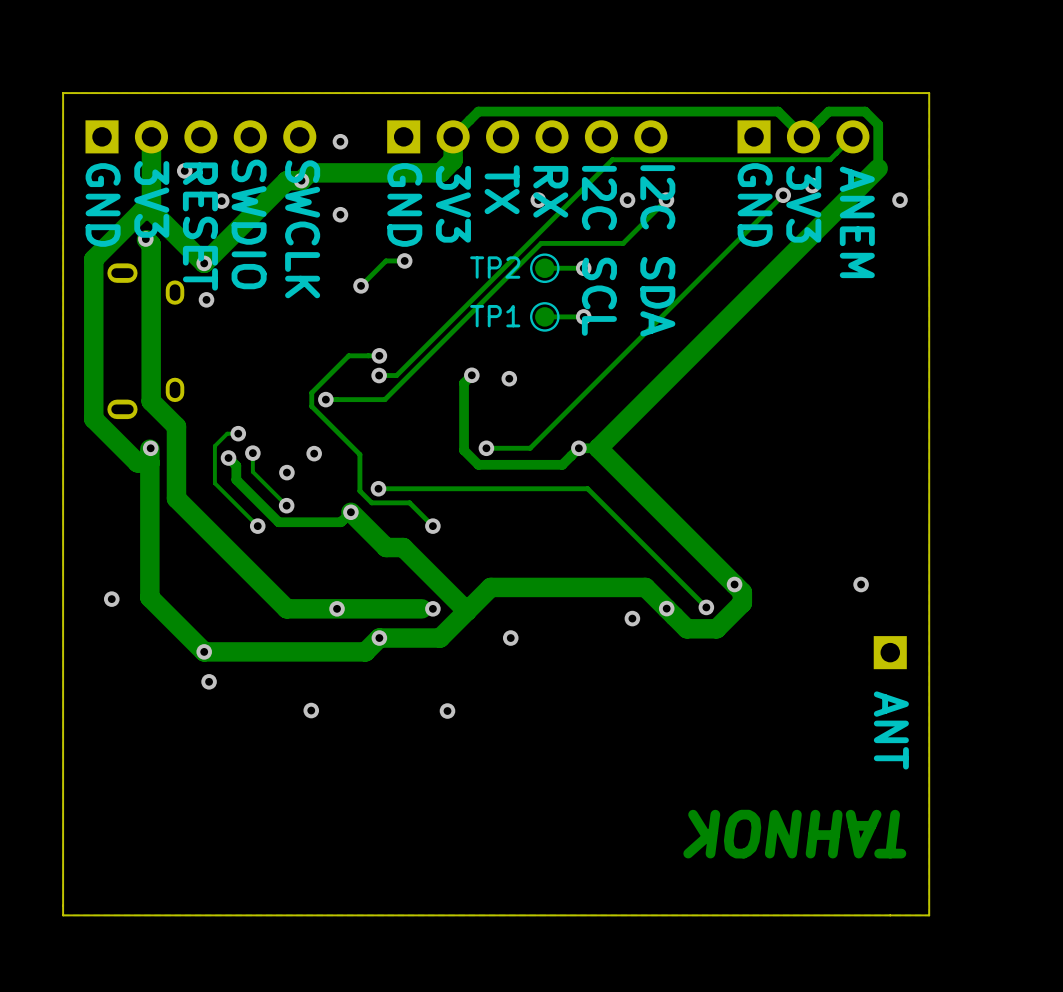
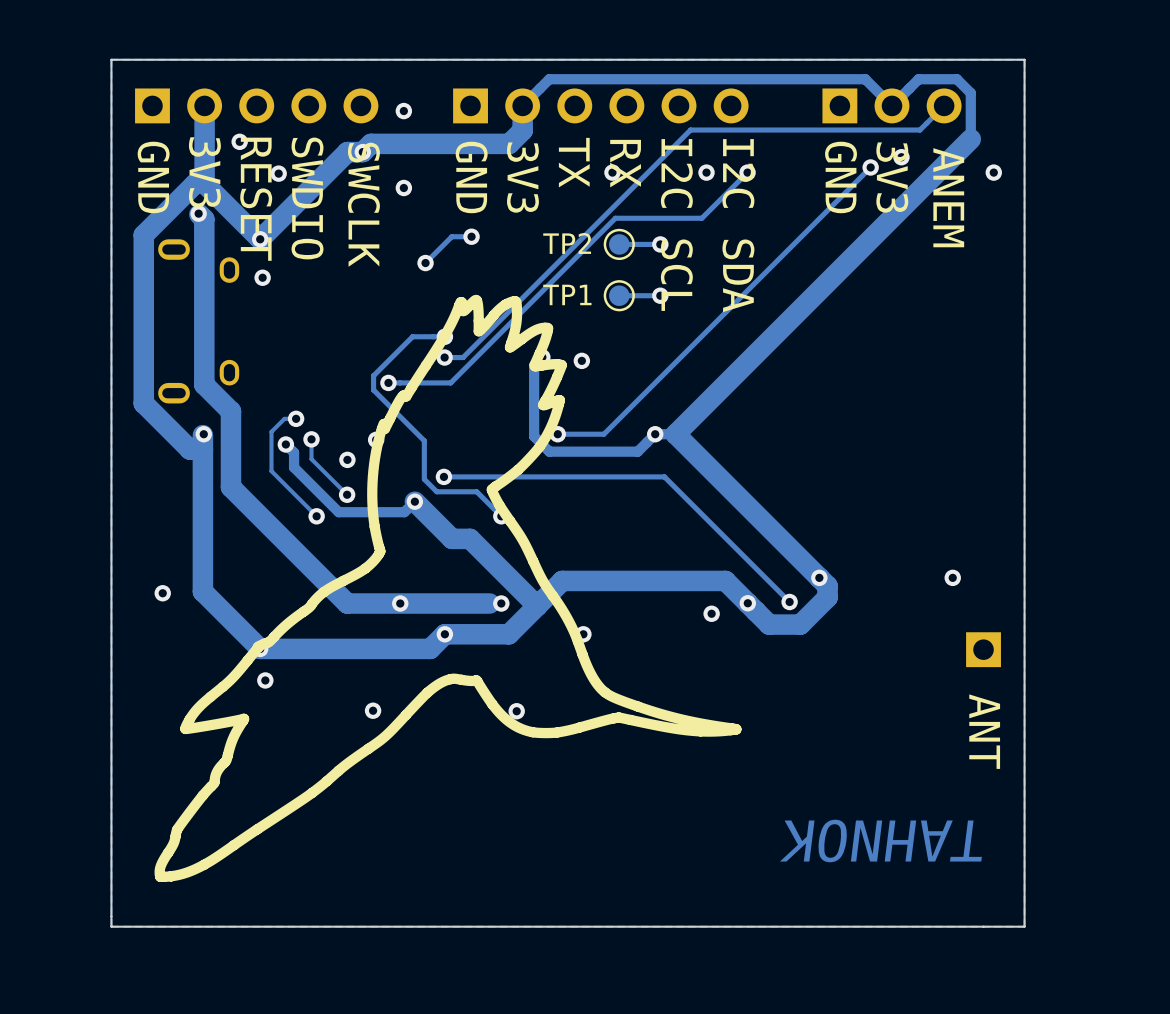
drawing: none -> [154, 294, 742, 882]

